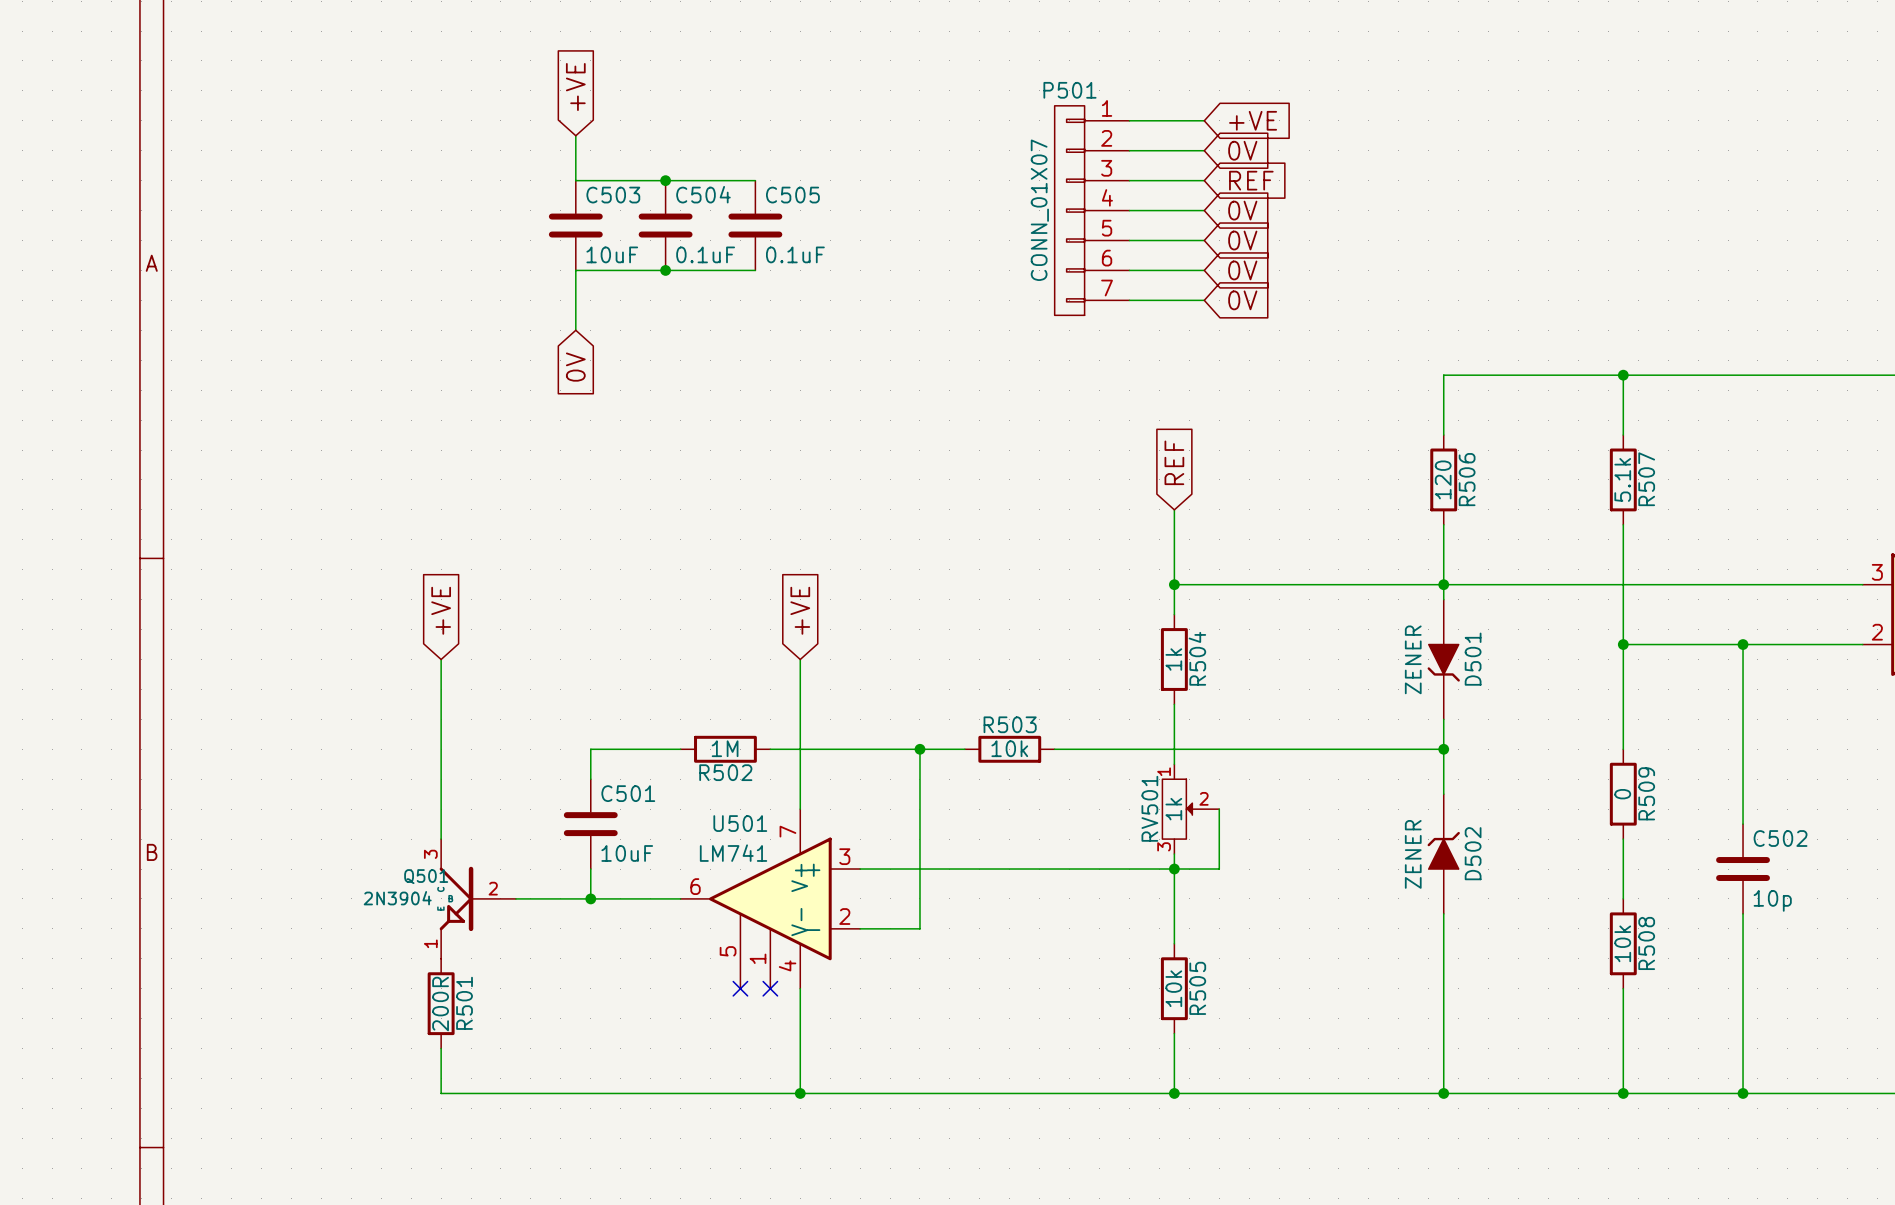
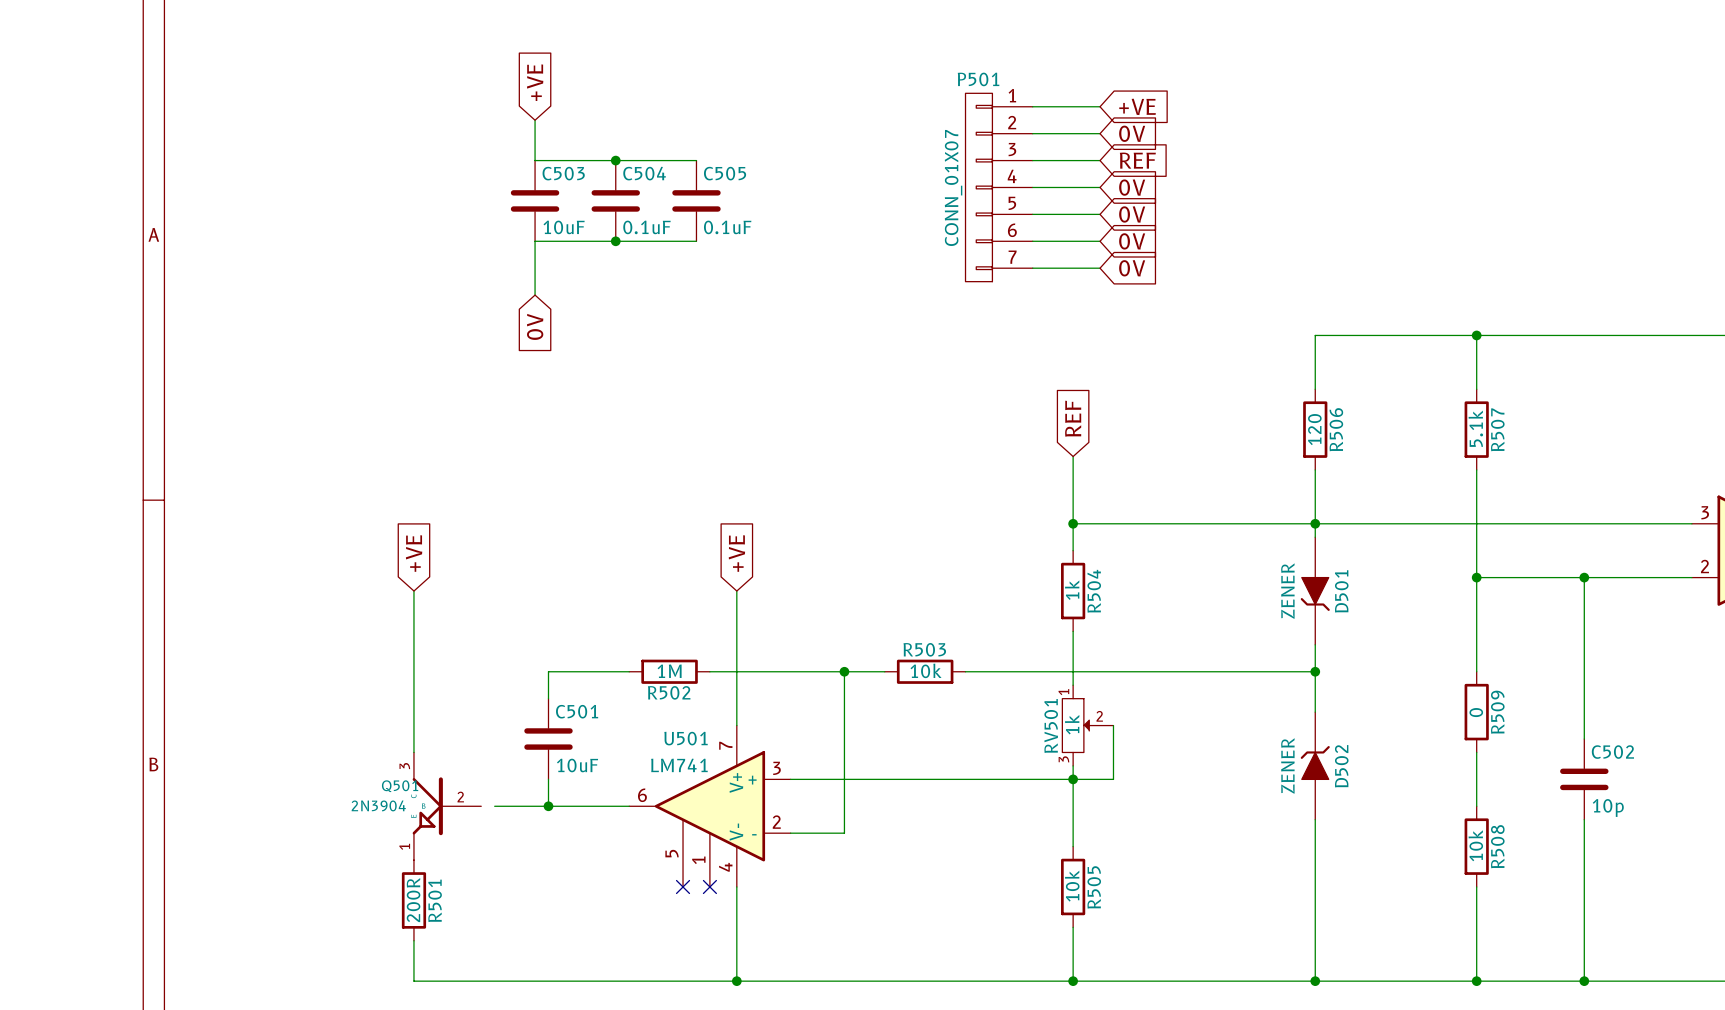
wire: (515, 898) (530, 898) -> none

